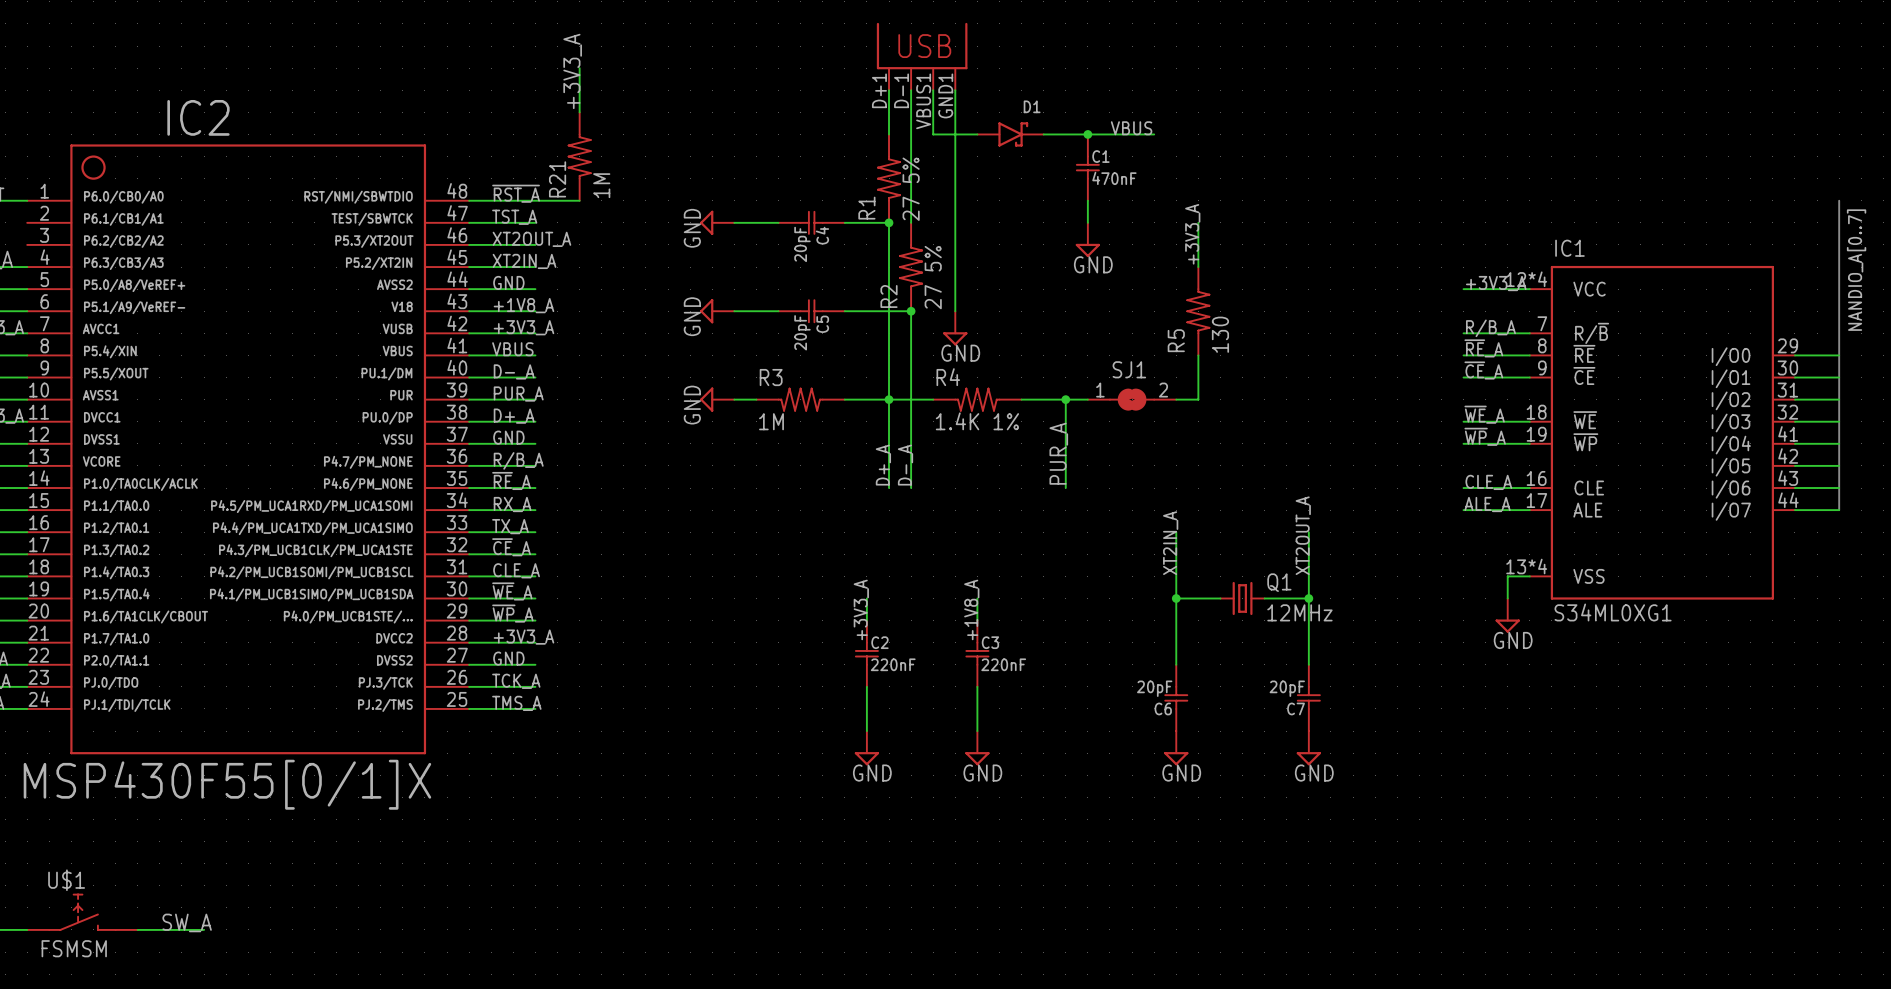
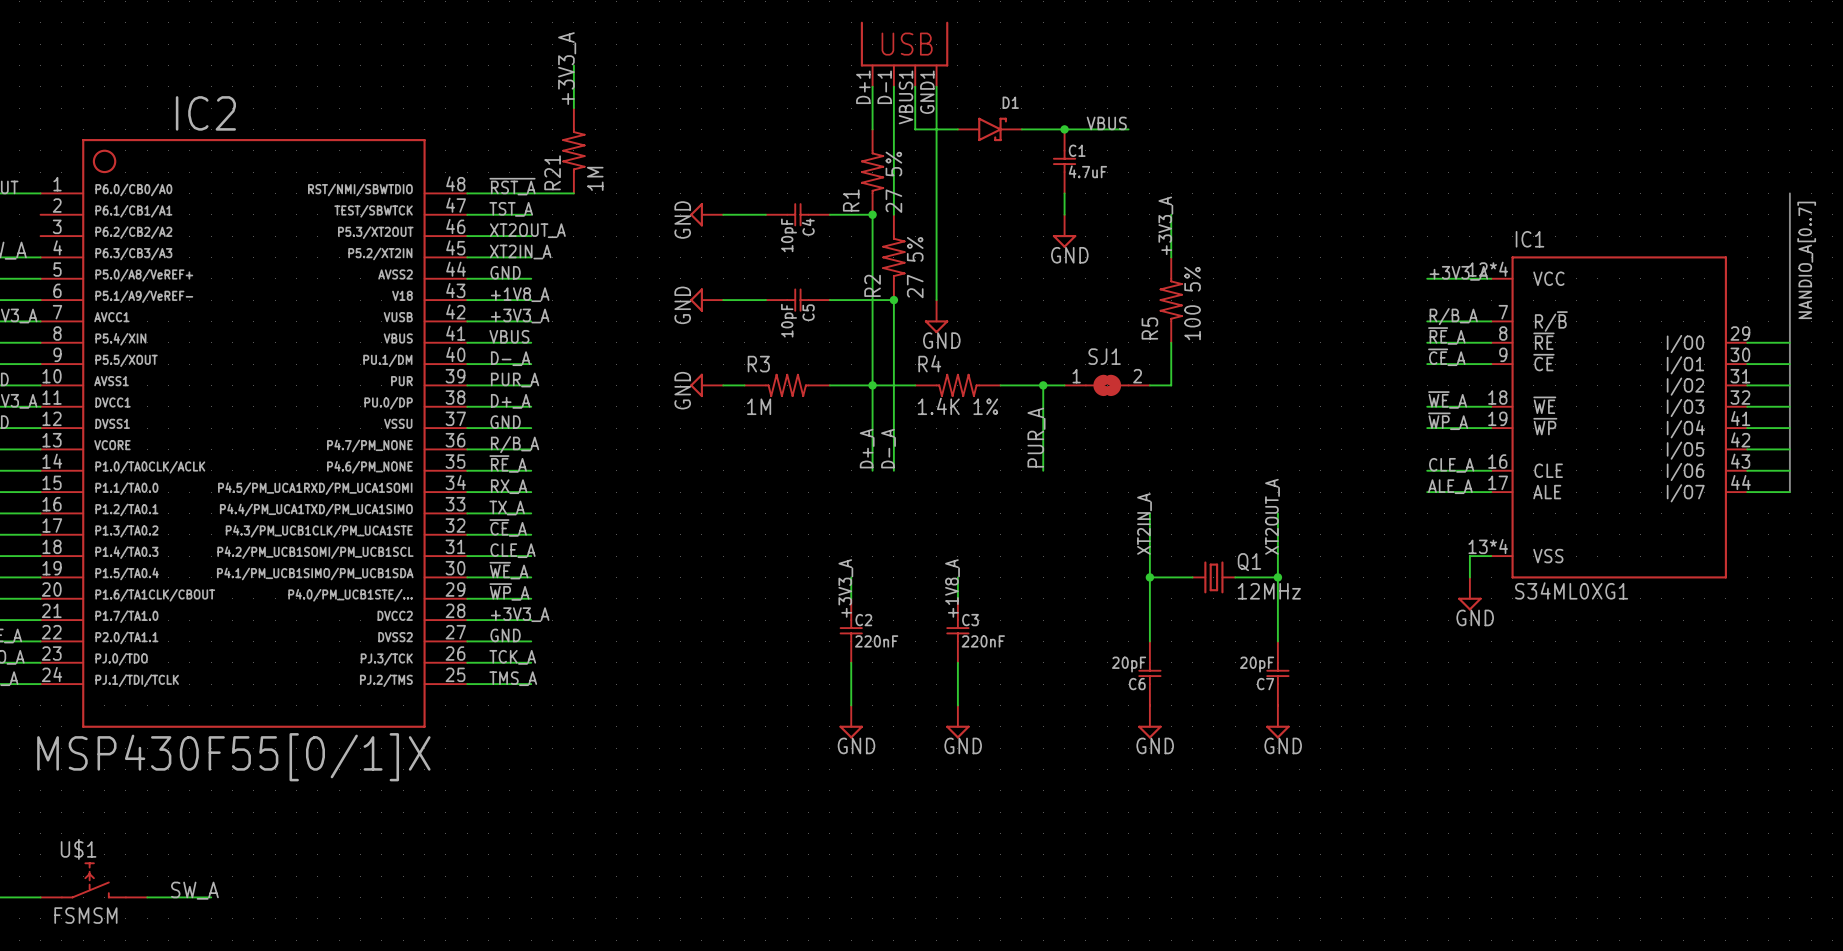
C1 value: 470nF (1114, 178) -> 4.7uF (1087, 171)
C4 value: 20pF (802, 244) -> 10pF (789, 235)
C5 value: 20pF (802, 332) -> 10pF (789, 320)
R5 value: 130 (1220, 334) -> 100 5% (1192, 303)

